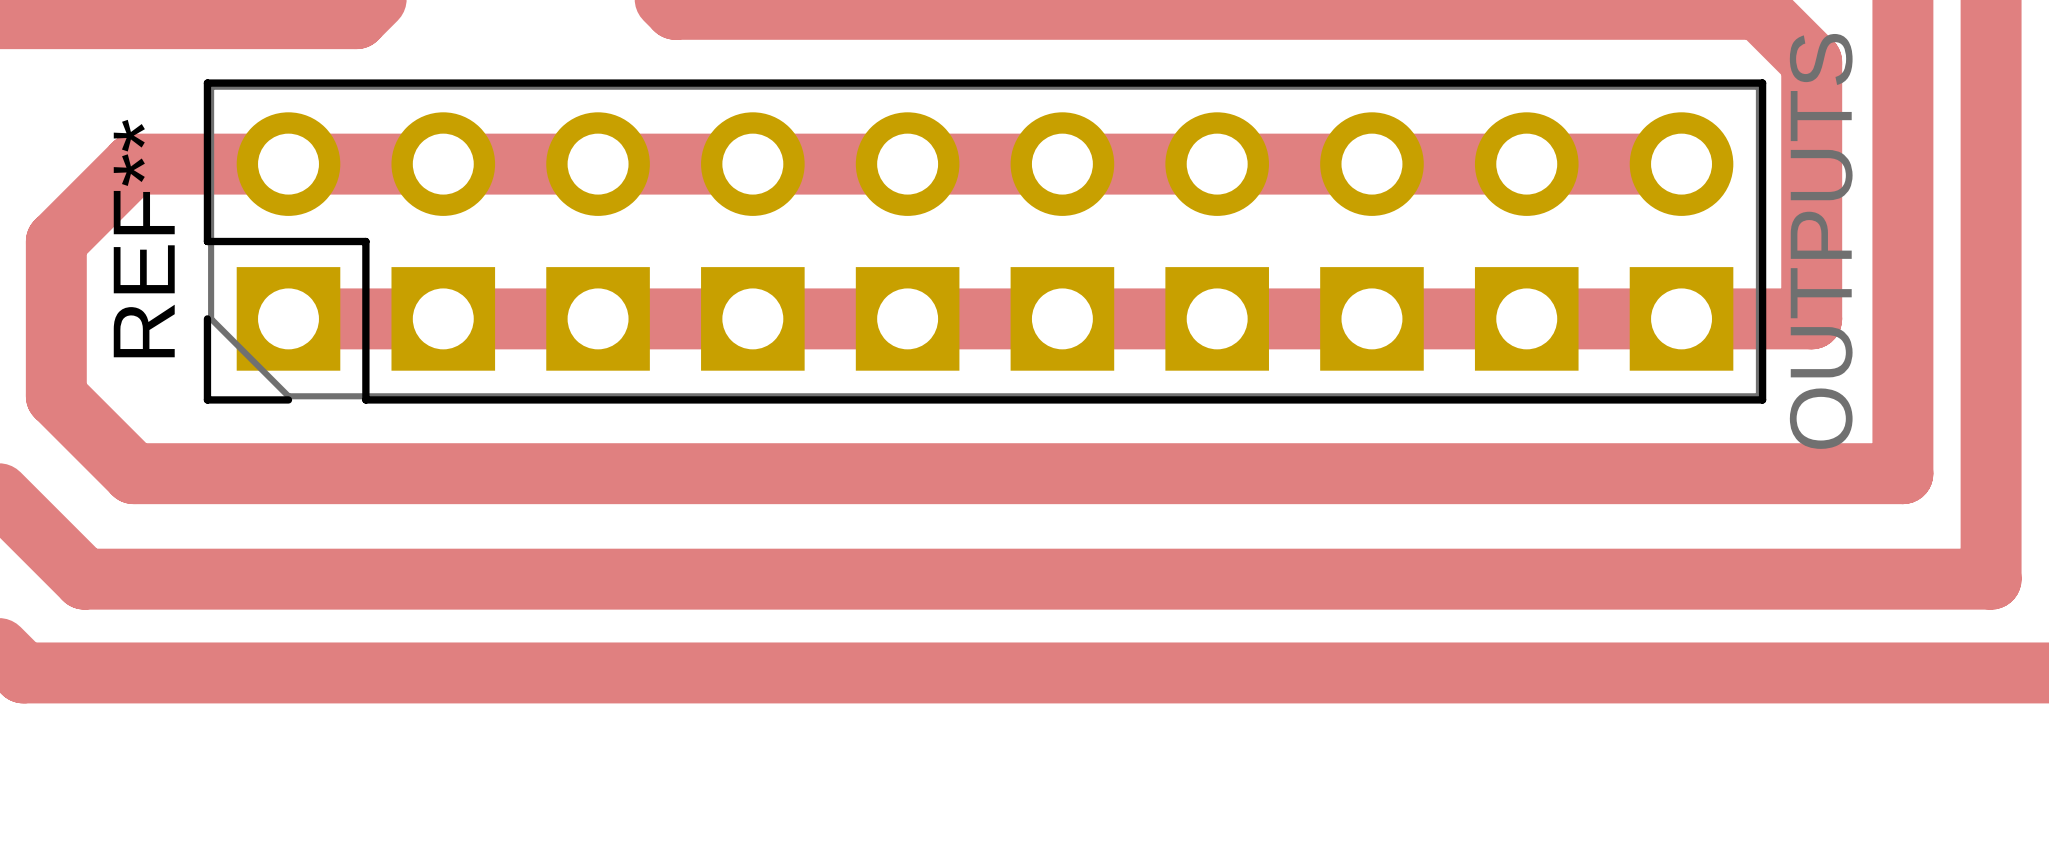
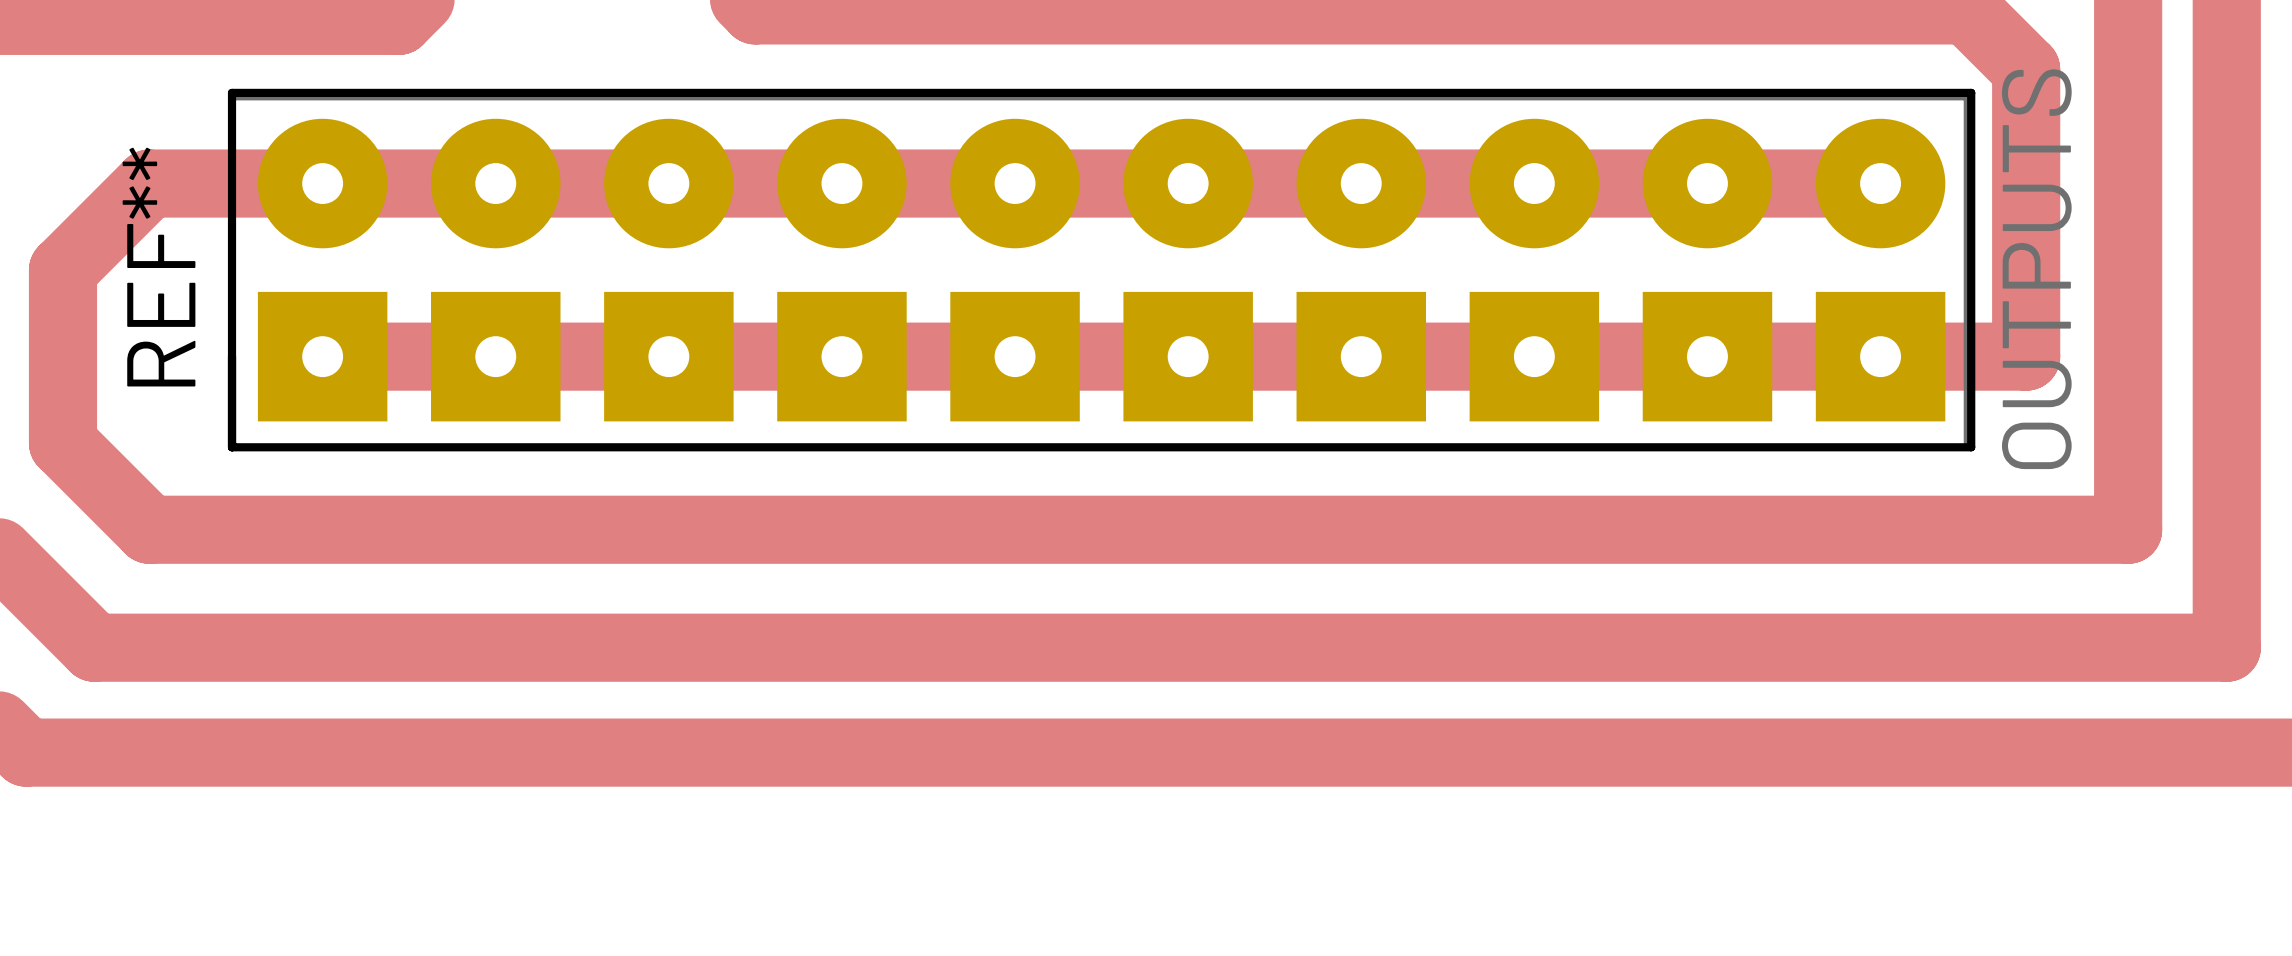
REF** footprint: [203, 79, 1767, 404] -> [227, 88, 1976, 452]

